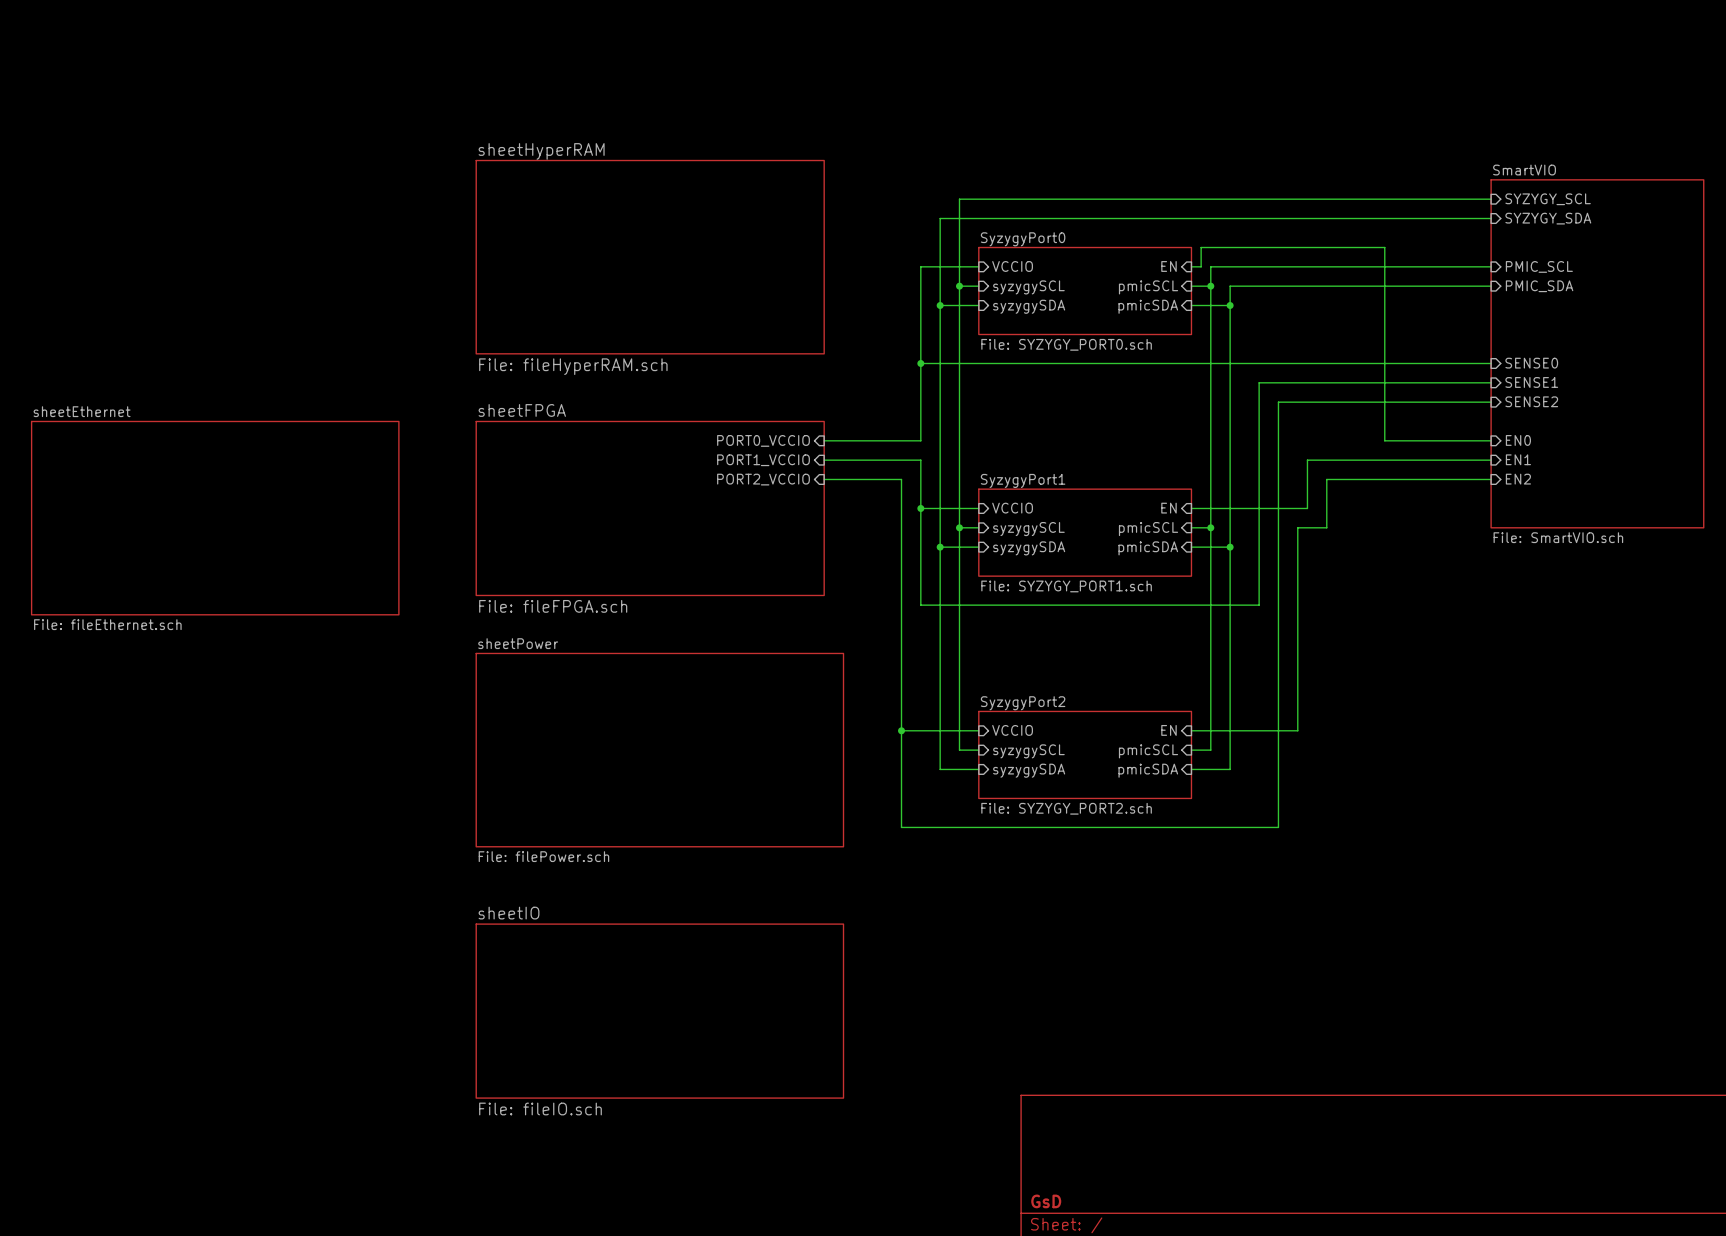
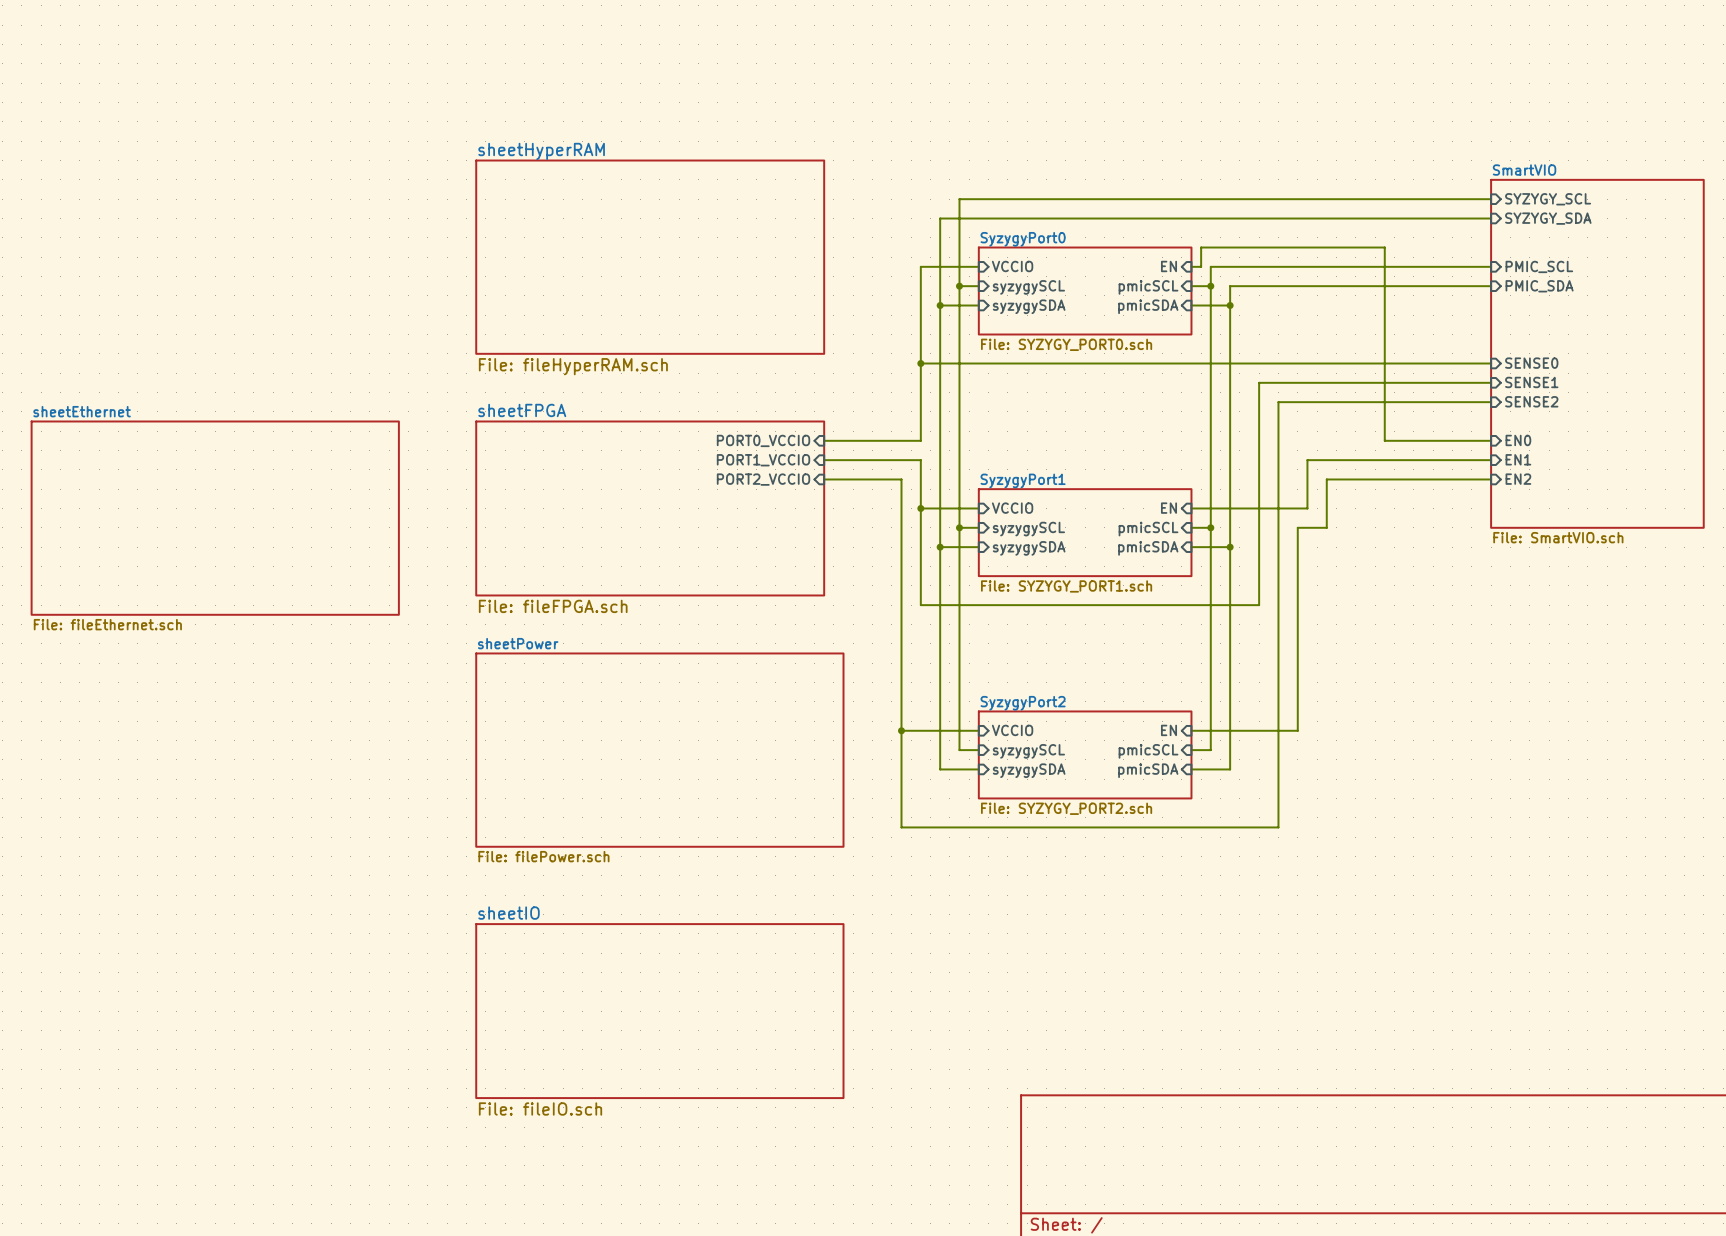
title block: GsD (1046, 1201) -> none

